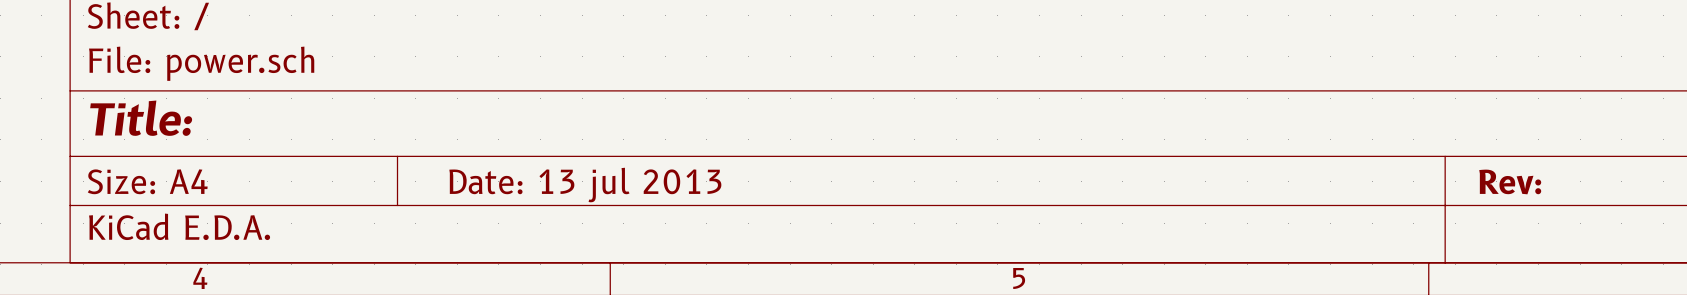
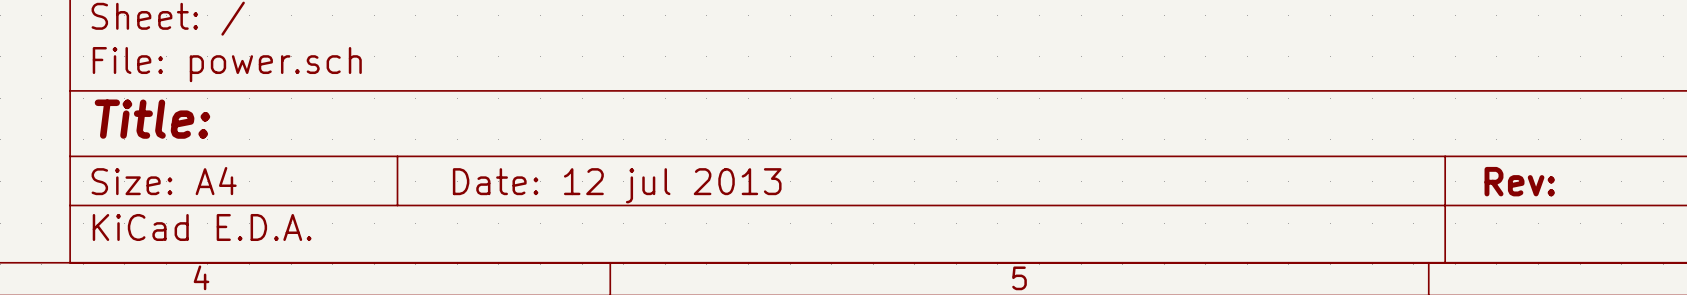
title block: Date: 13 jul 2013 (585, 185) -> Date: 12 jul 2013 (617, 185)

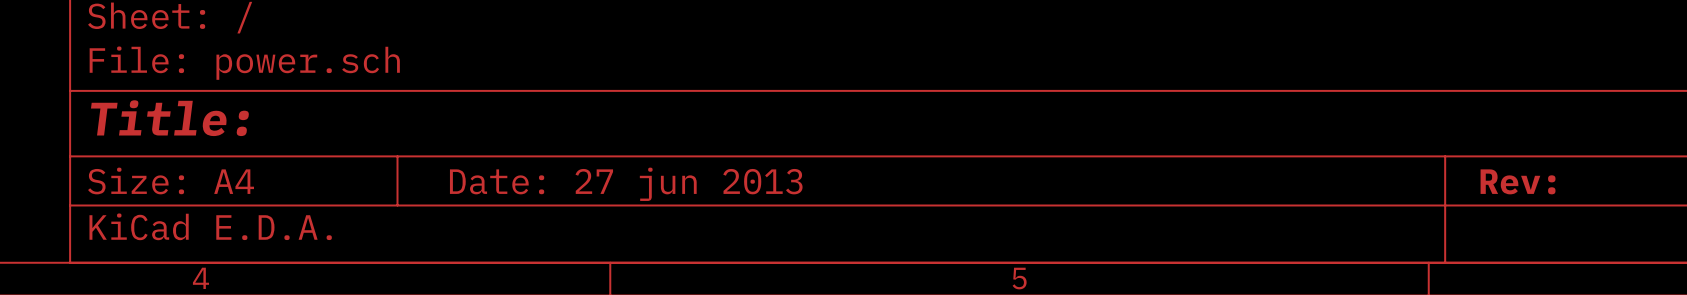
title block: Date: 12 jul 2013 (617, 185) -> Date: 27 jun 2013 (626, 184)

